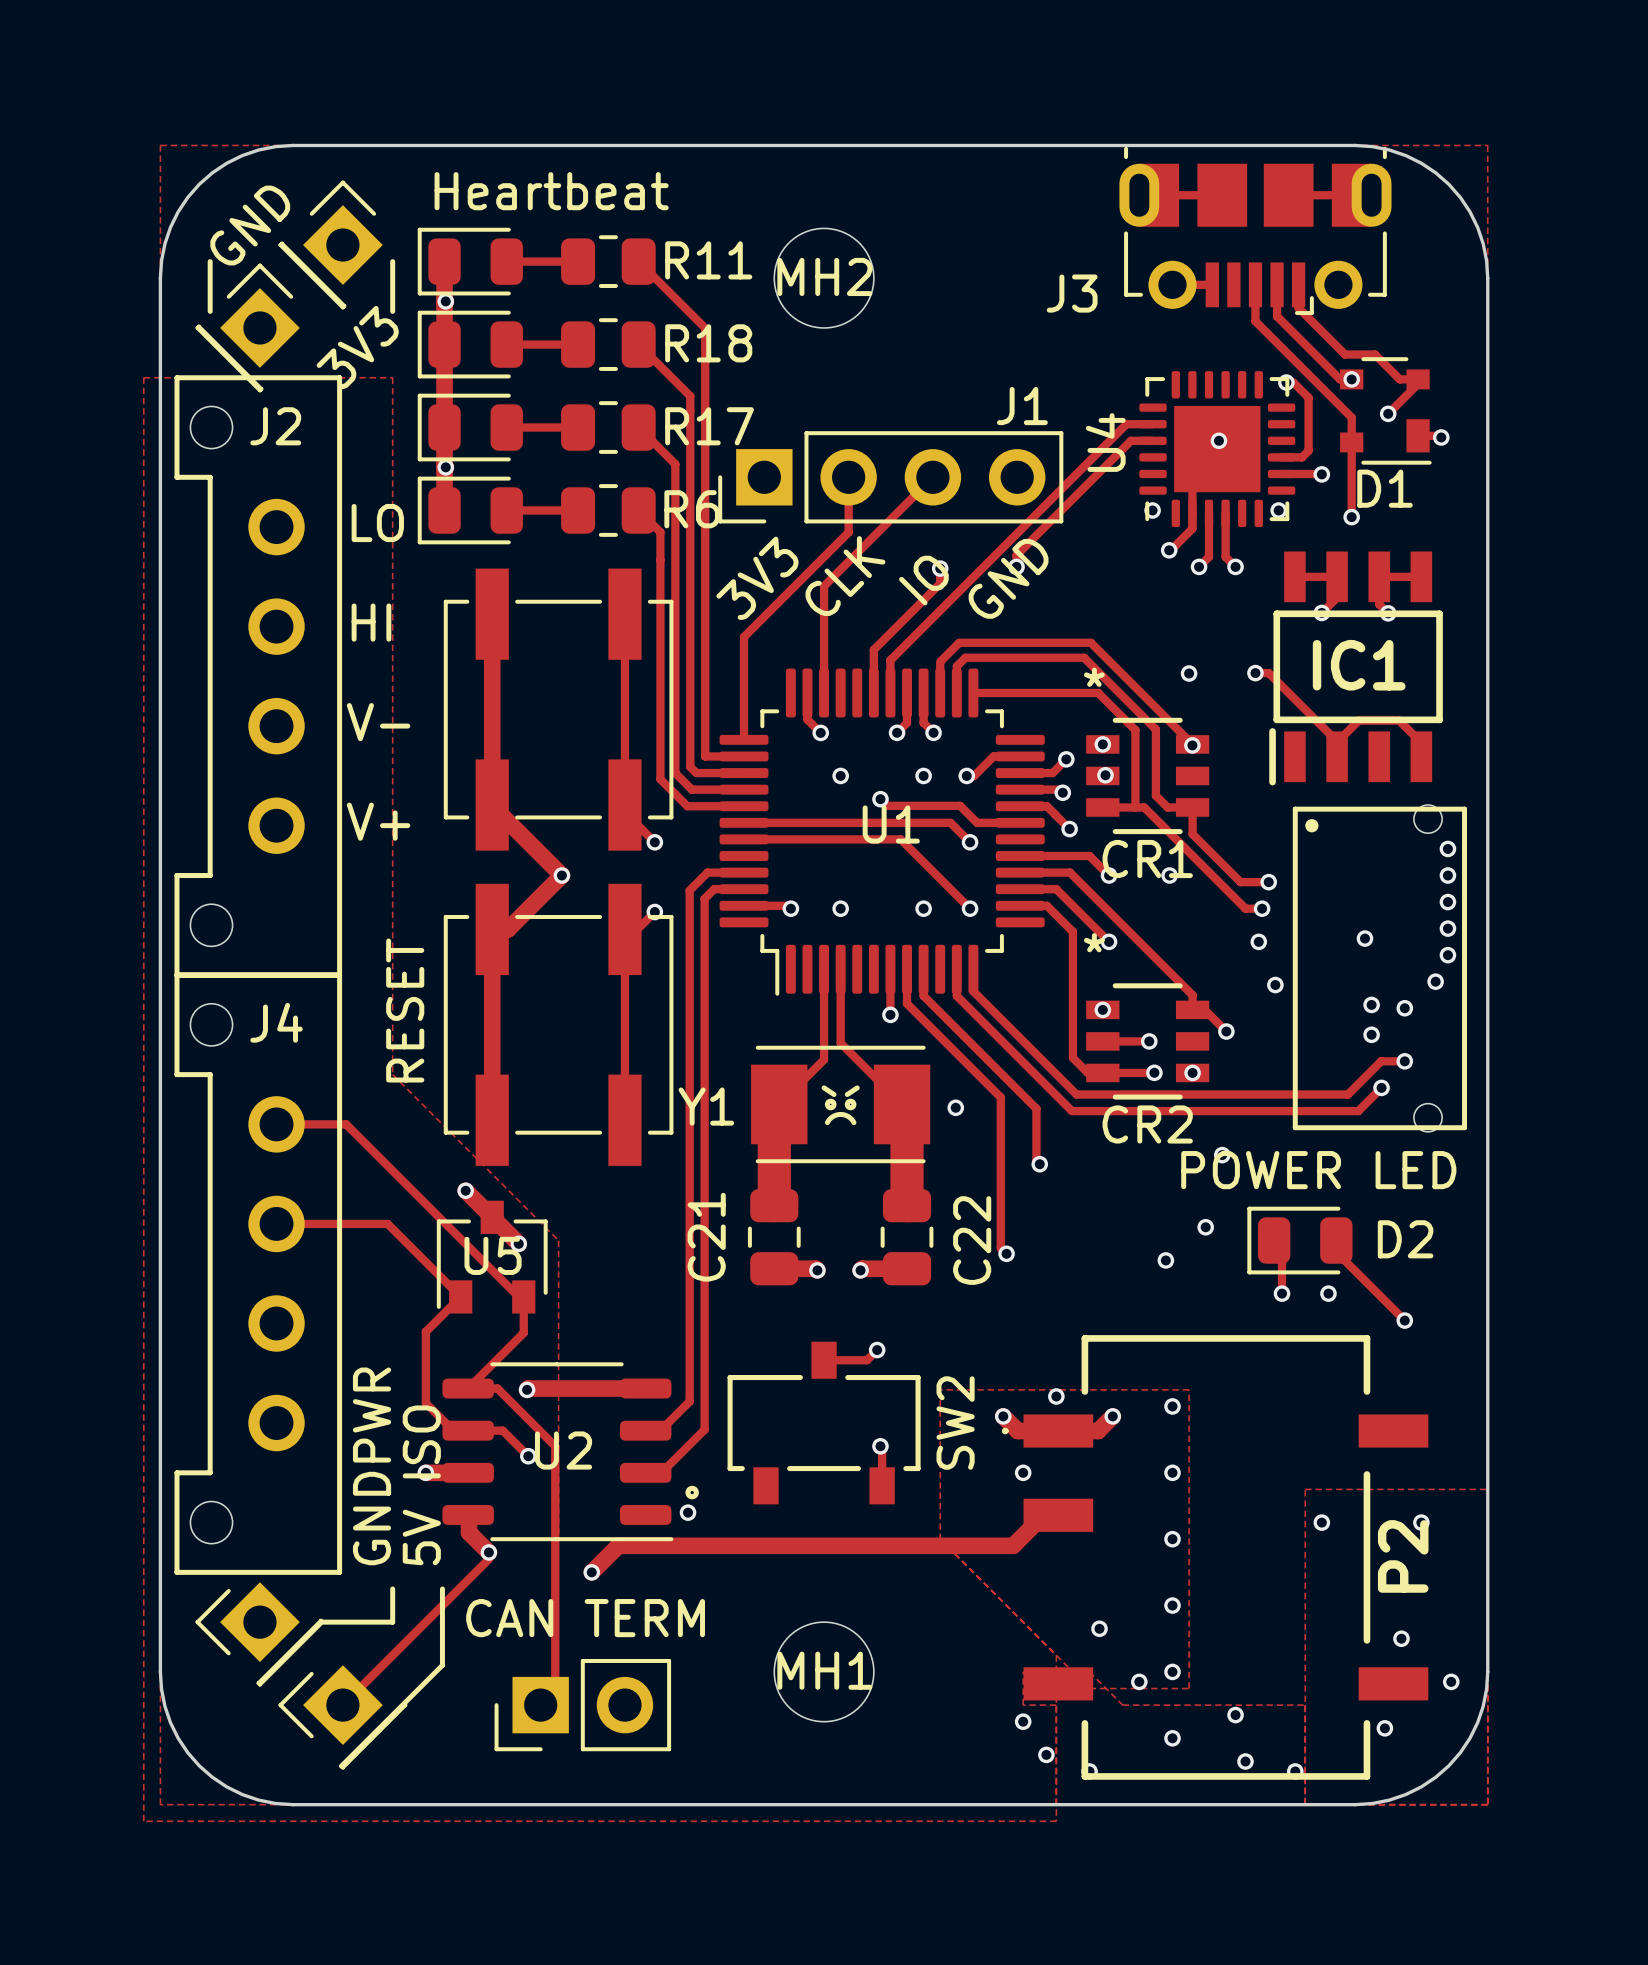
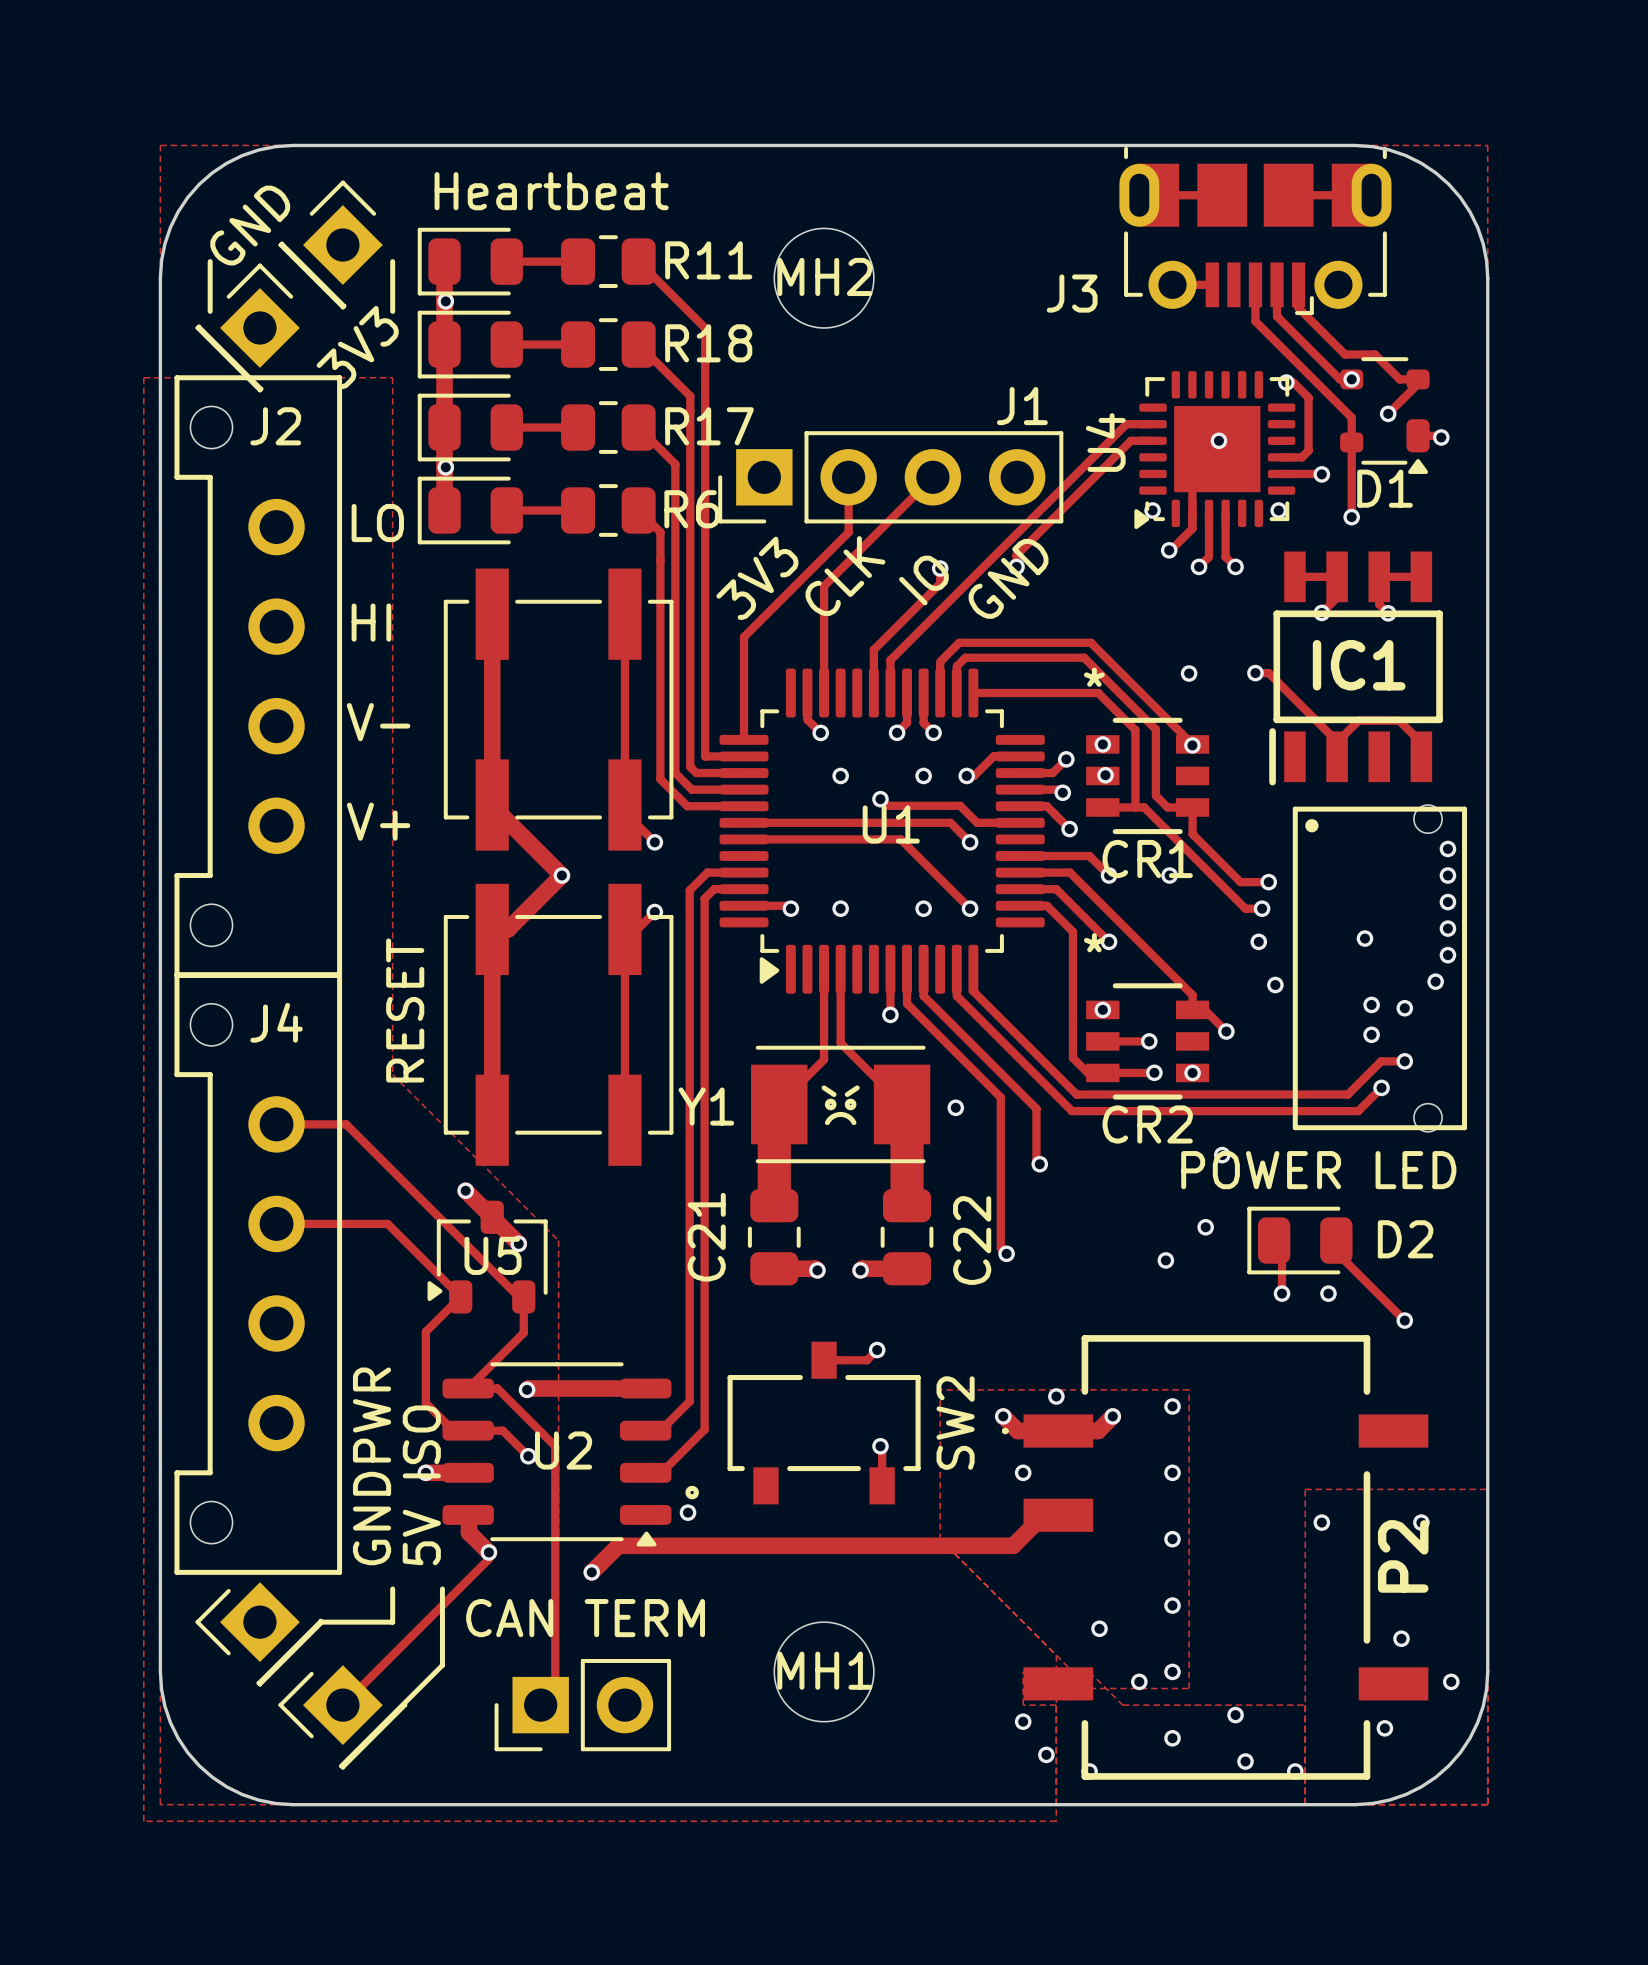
D1 footprint: [1340, 357, 1432, 465] -> [1340, 357, 1430, 474]
U4 footprint: [1139, 371, 1296, 528] -> [1134, 371, 1296, 530]
U1 footprint: [719, 668, 1045, 996] -> [719, 668, 1045, 994]
U5 footprint: [436, 1200, 548, 1314] -> [427, 1200, 548, 1314]
U2 footprint: [442, 1362, 674, 1542] -> [442, 1362, 672, 1547]

